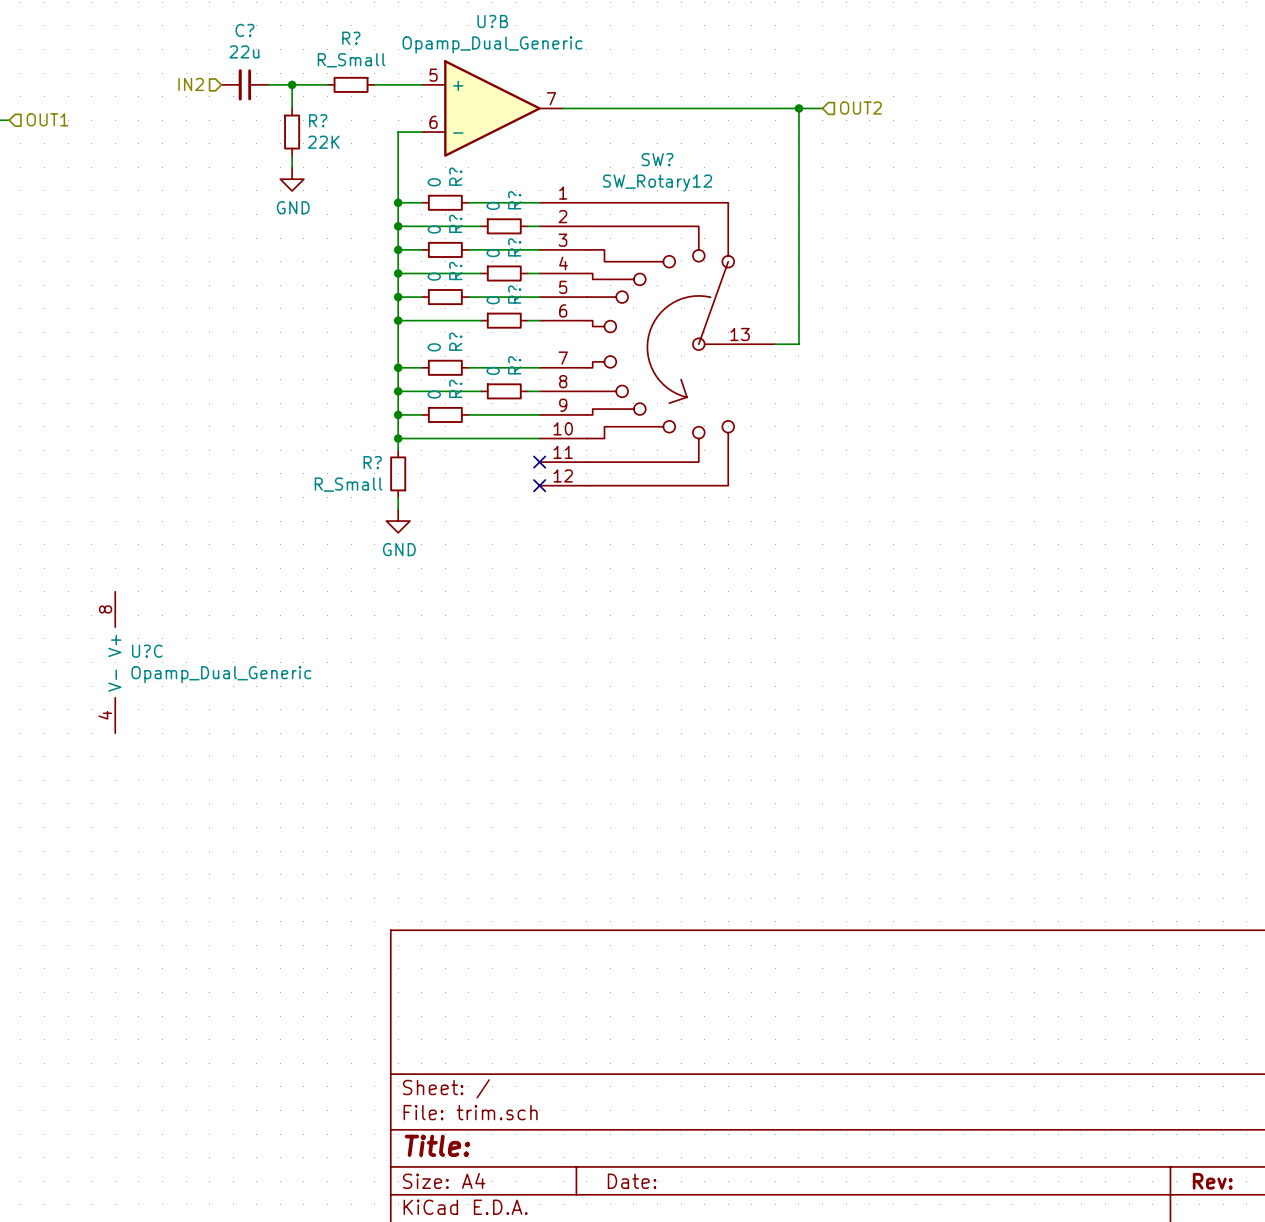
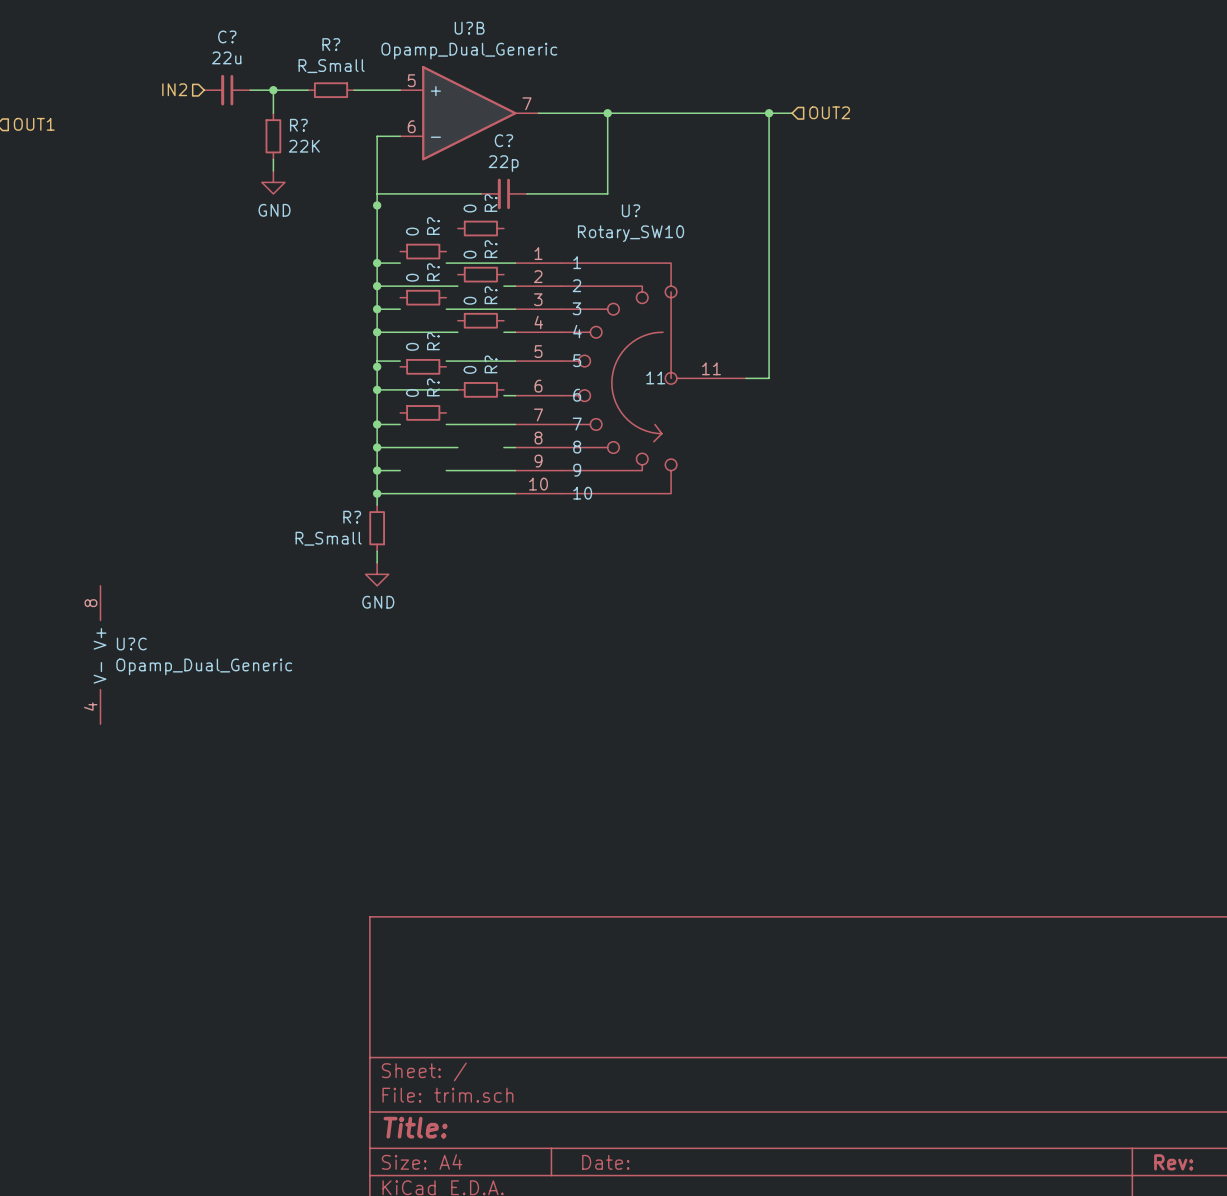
wire: none -> (607, 113) (607, 193) (526, 193)
junction: none -> (607, 113)
wire: none -> (377, 193) (480, 193)
C?: none -> 22p (503, 193)
wire: (398, 202) (421, 202) -> (377, 263) (400, 263)
R?: 0 (445, 202) -> none
wire: (468, 202) (539, 202) -> (446, 263) (515, 263)
wire: (398, 226) (480, 226) -> (377, 286) (457, 286)
junction: (398, 226) -> none
wire: (527, 226) (539, 226) -> (503, 286) (515, 286)
wire: (398, 249) (421, 249) -> (377, 309) (400, 309)
junction: (398, 249) -> none
wire: (468, 249) (539, 249) -> (446, 309) (515, 309)
junction: none -> (377, 263)
wire: (398, 273) (480, 273) -> (377, 332) (457, 332)
junction: (398, 273) -> none
wire: (527, 273) (539, 273) -> (503, 332) (515, 332)
junction: none -> (377, 286)
wire: (398, 297) (421, 297) -> (377, 361) (400, 361)
junction: (398, 297) -> none
wire: (468, 297) (539, 297) -> (446, 361) (515, 361)
junction: none -> (377, 309)
wire: (398, 320) (480, 320) -> none
junction: (398, 320) -> none
wire: (527, 320) (539, 320) -> (503, 395) (515, 395)
junction: none -> (377, 332)
SW?: SW_Rotary12 (657, 344) -> none
wire: (775, 344) (798, 344) -> (746, 378) (769, 378) (769, 343)
wire: (398, 367) (421, 367) -> (377, 424) (400, 424)
wire: (468, 367) (539, 367) -> (446, 424) (515, 424)
U?: none -> Rotary_SW10 (630, 378)
wire: (527, 391) (539, 391) -> (503, 447) (515, 447)
wire: (398, 414) (421, 414) -> (377, 470) (400, 470)
junction: (398, 414) -> none
wire: (468, 414) (539, 414) -> (446, 470) (515, 470)
junction: none -> (377, 424)
wire: (398, 438) (539, 438) -> none
junction: (398, 438) -> none
junction: none -> (377, 447)
wire: none -> (457, 447) (377, 447) (377, 493) (515, 493)
no-connect mark: (539, 462) -> none
R? position: (398, 473) -> (377, 528)
junction: none -> (377, 470)
no-connect mark: (539, 485) -> none
junction: none -> (377, 493)
power symbol position: GND (398, 521) -> GND (377, 574)
wire: none -> (377, 551) (377, 562)

